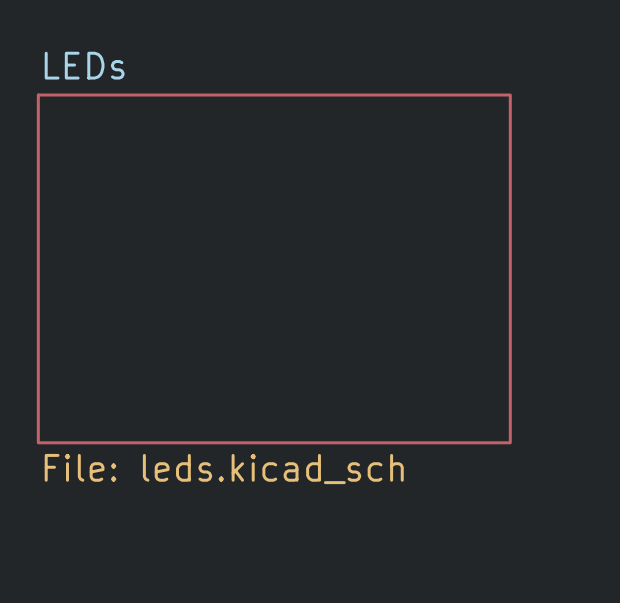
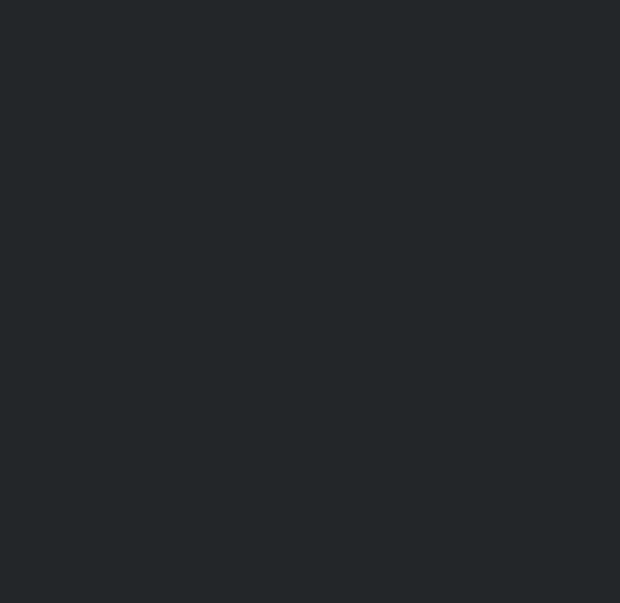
sheet LEDs: File: leds.kicad_sch (274, 268) -> none

